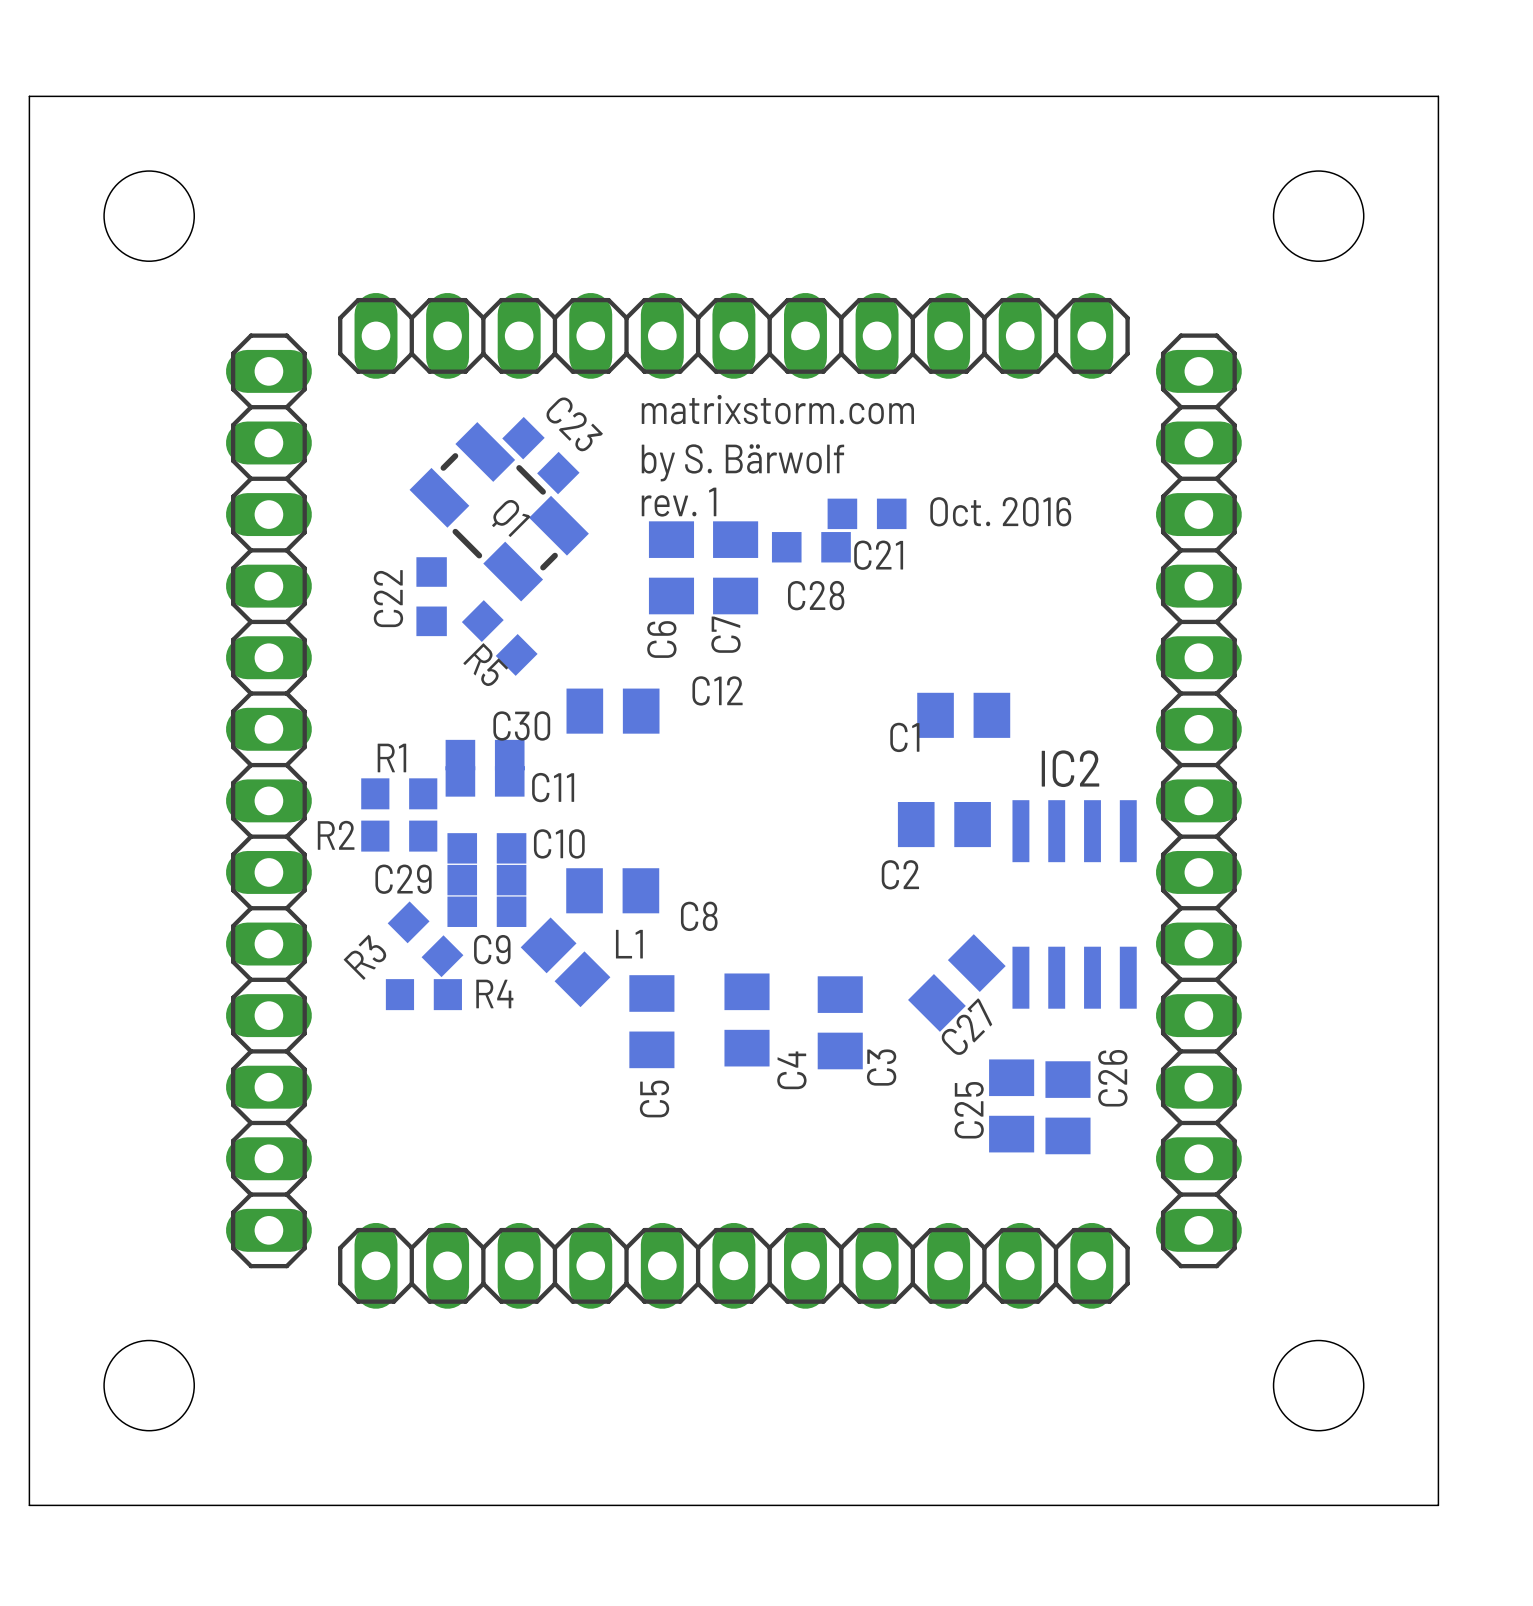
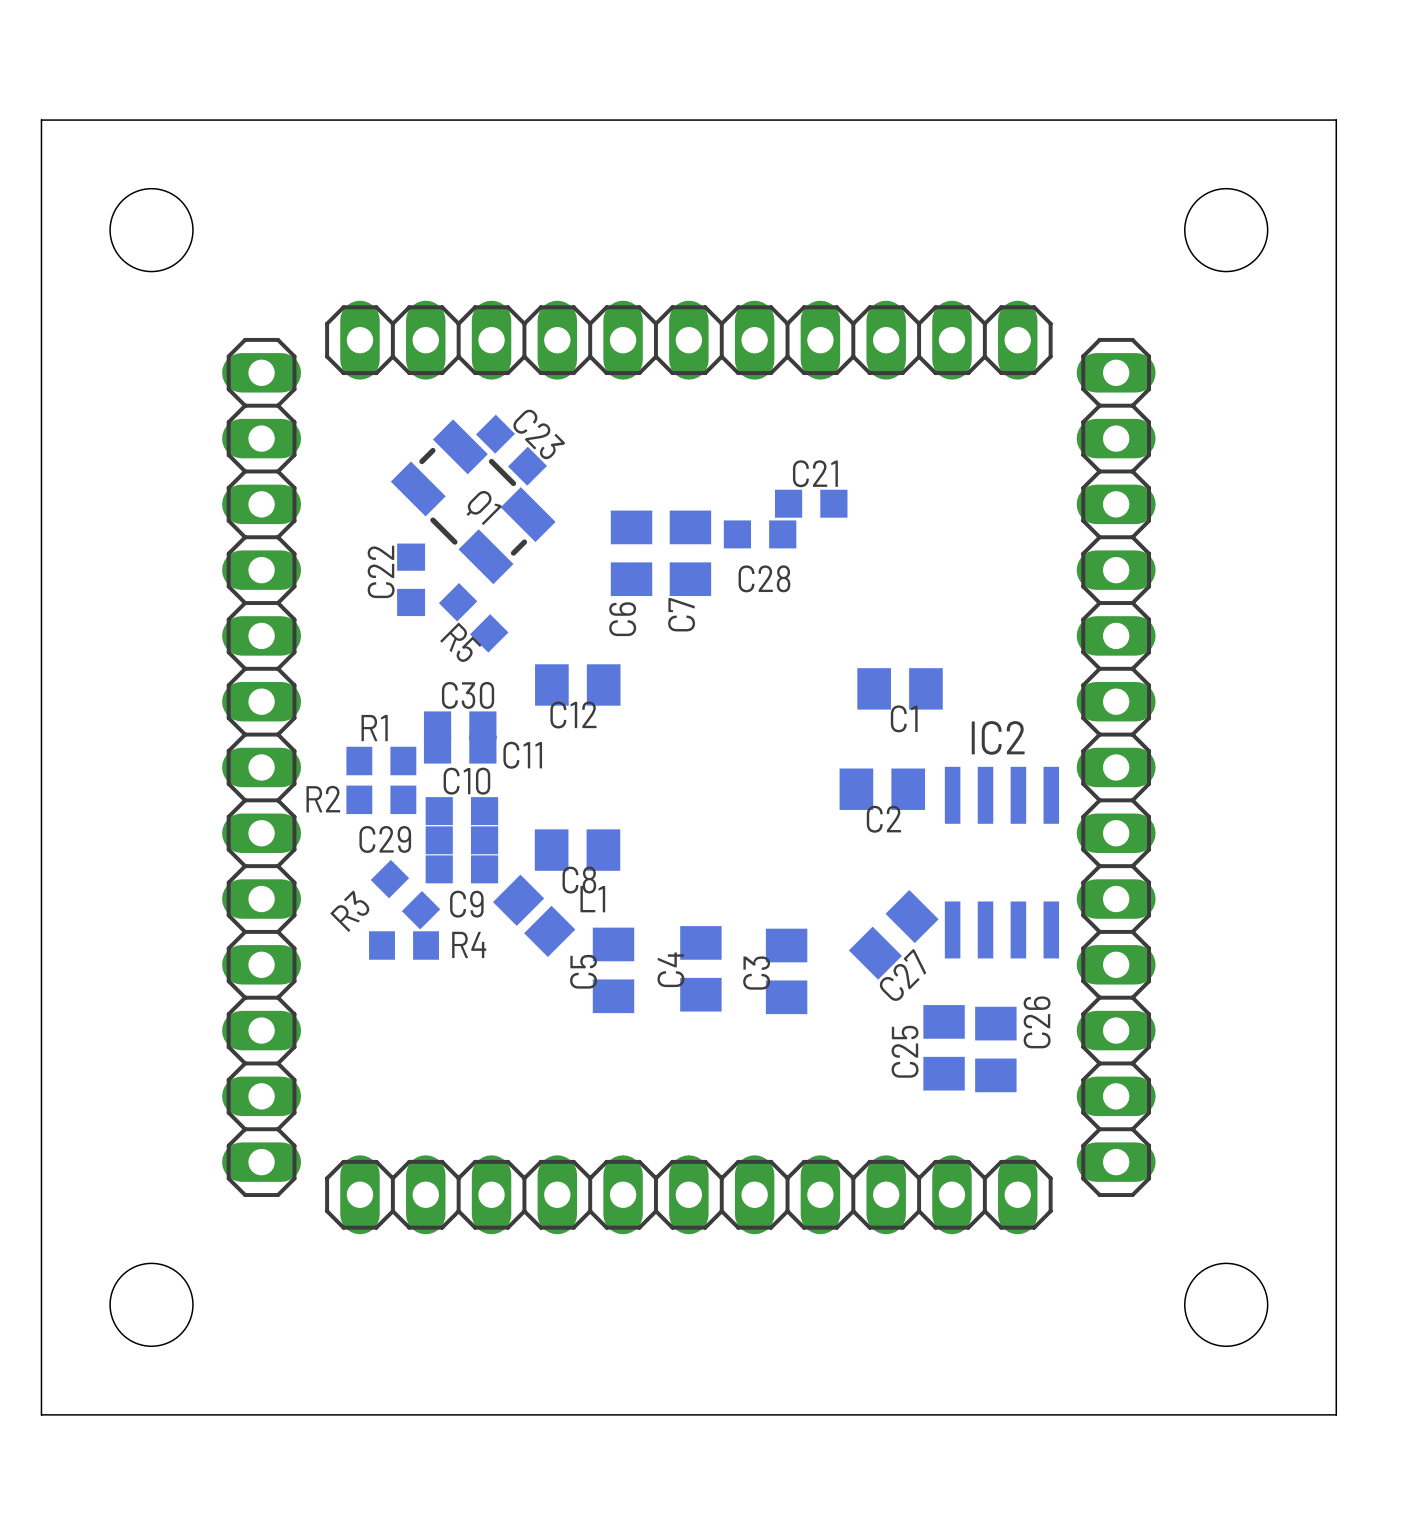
text: matrixstorm.com (777, 409) -> none
C23 name position: C23 (574, 424) -> C23 (539, 434)
text: by S. Bärwolf (742, 462) -> none
text: rev. 1 (679, 502) -> none
text: Oct. 2016 (1000, 511) -> none
C21 name position: C21 (878, 555) -> C21 (815, 473)
C22 name position: C22 (388, 598) -> C22 (381, 571)
C12 name position: C12 (717, 690) -> C12 (573, 715)
C30 name position: C30 (521, 725) -> C30 (468, 695)
C1 name position: C1 (904, 737) -> C1 (904, 718)
C10 name position: C10 (559, 843) -> C10 (466, 781)
C2 name position: C2 (900, 874) -> C2 (883, 819)
C8 name position: C8 (699, 916) -> C8 (579, 880)
C3 name position: C3 (881, 1067) -> C3 (756, 973)
C4 name position: C4 (791, 1070) -> C4 (670, 969)
C5 name position: C5 (654, 1098) -> C5 (583, 971)

